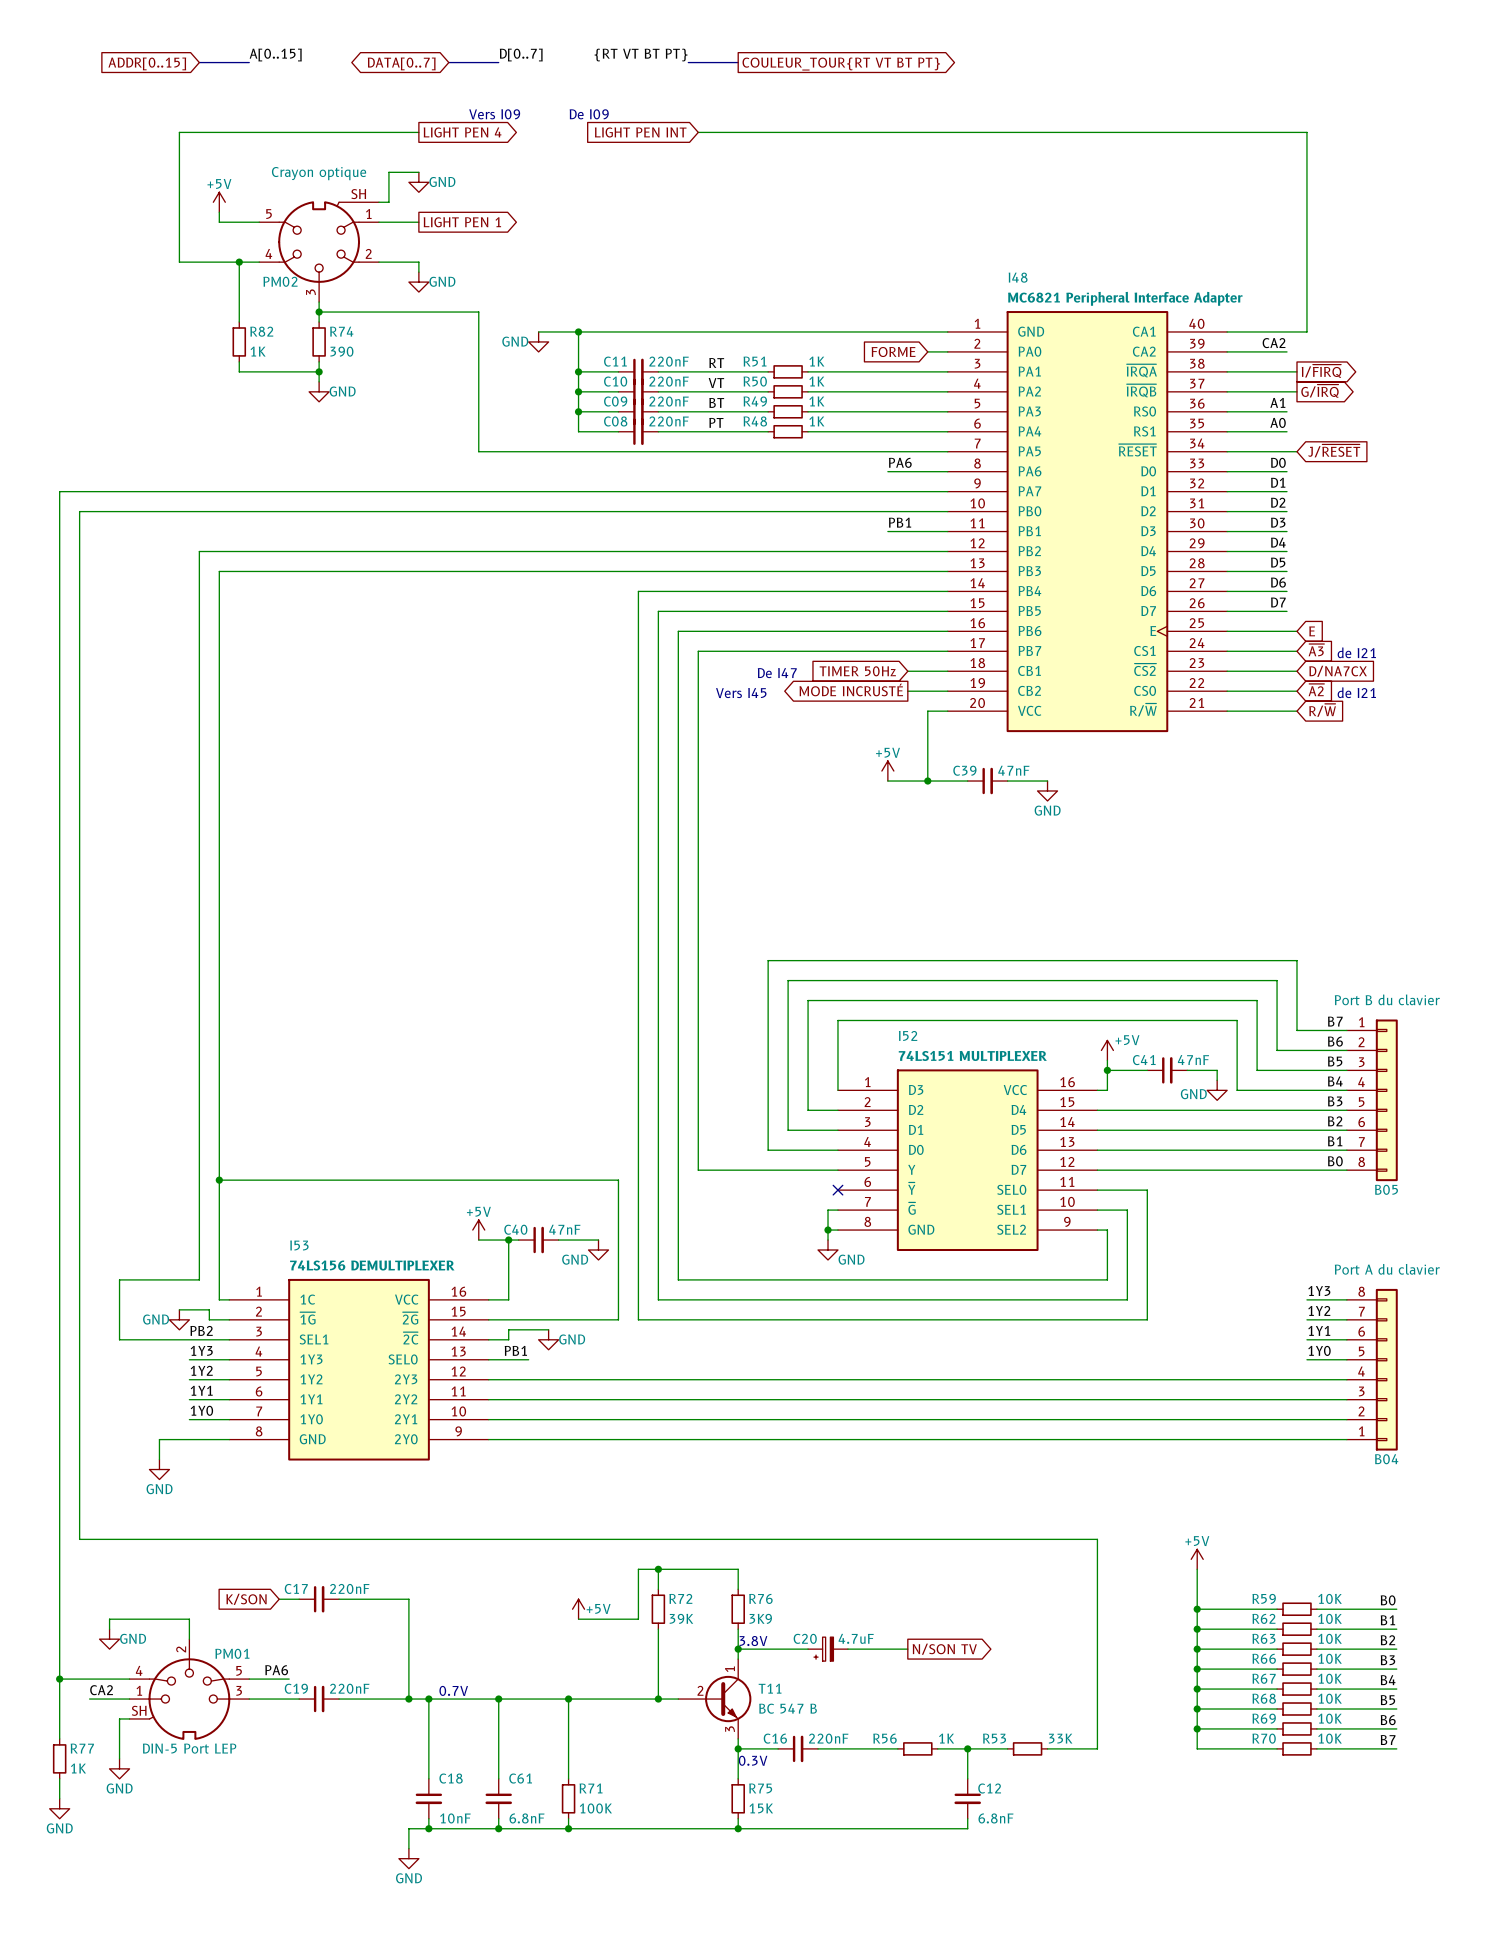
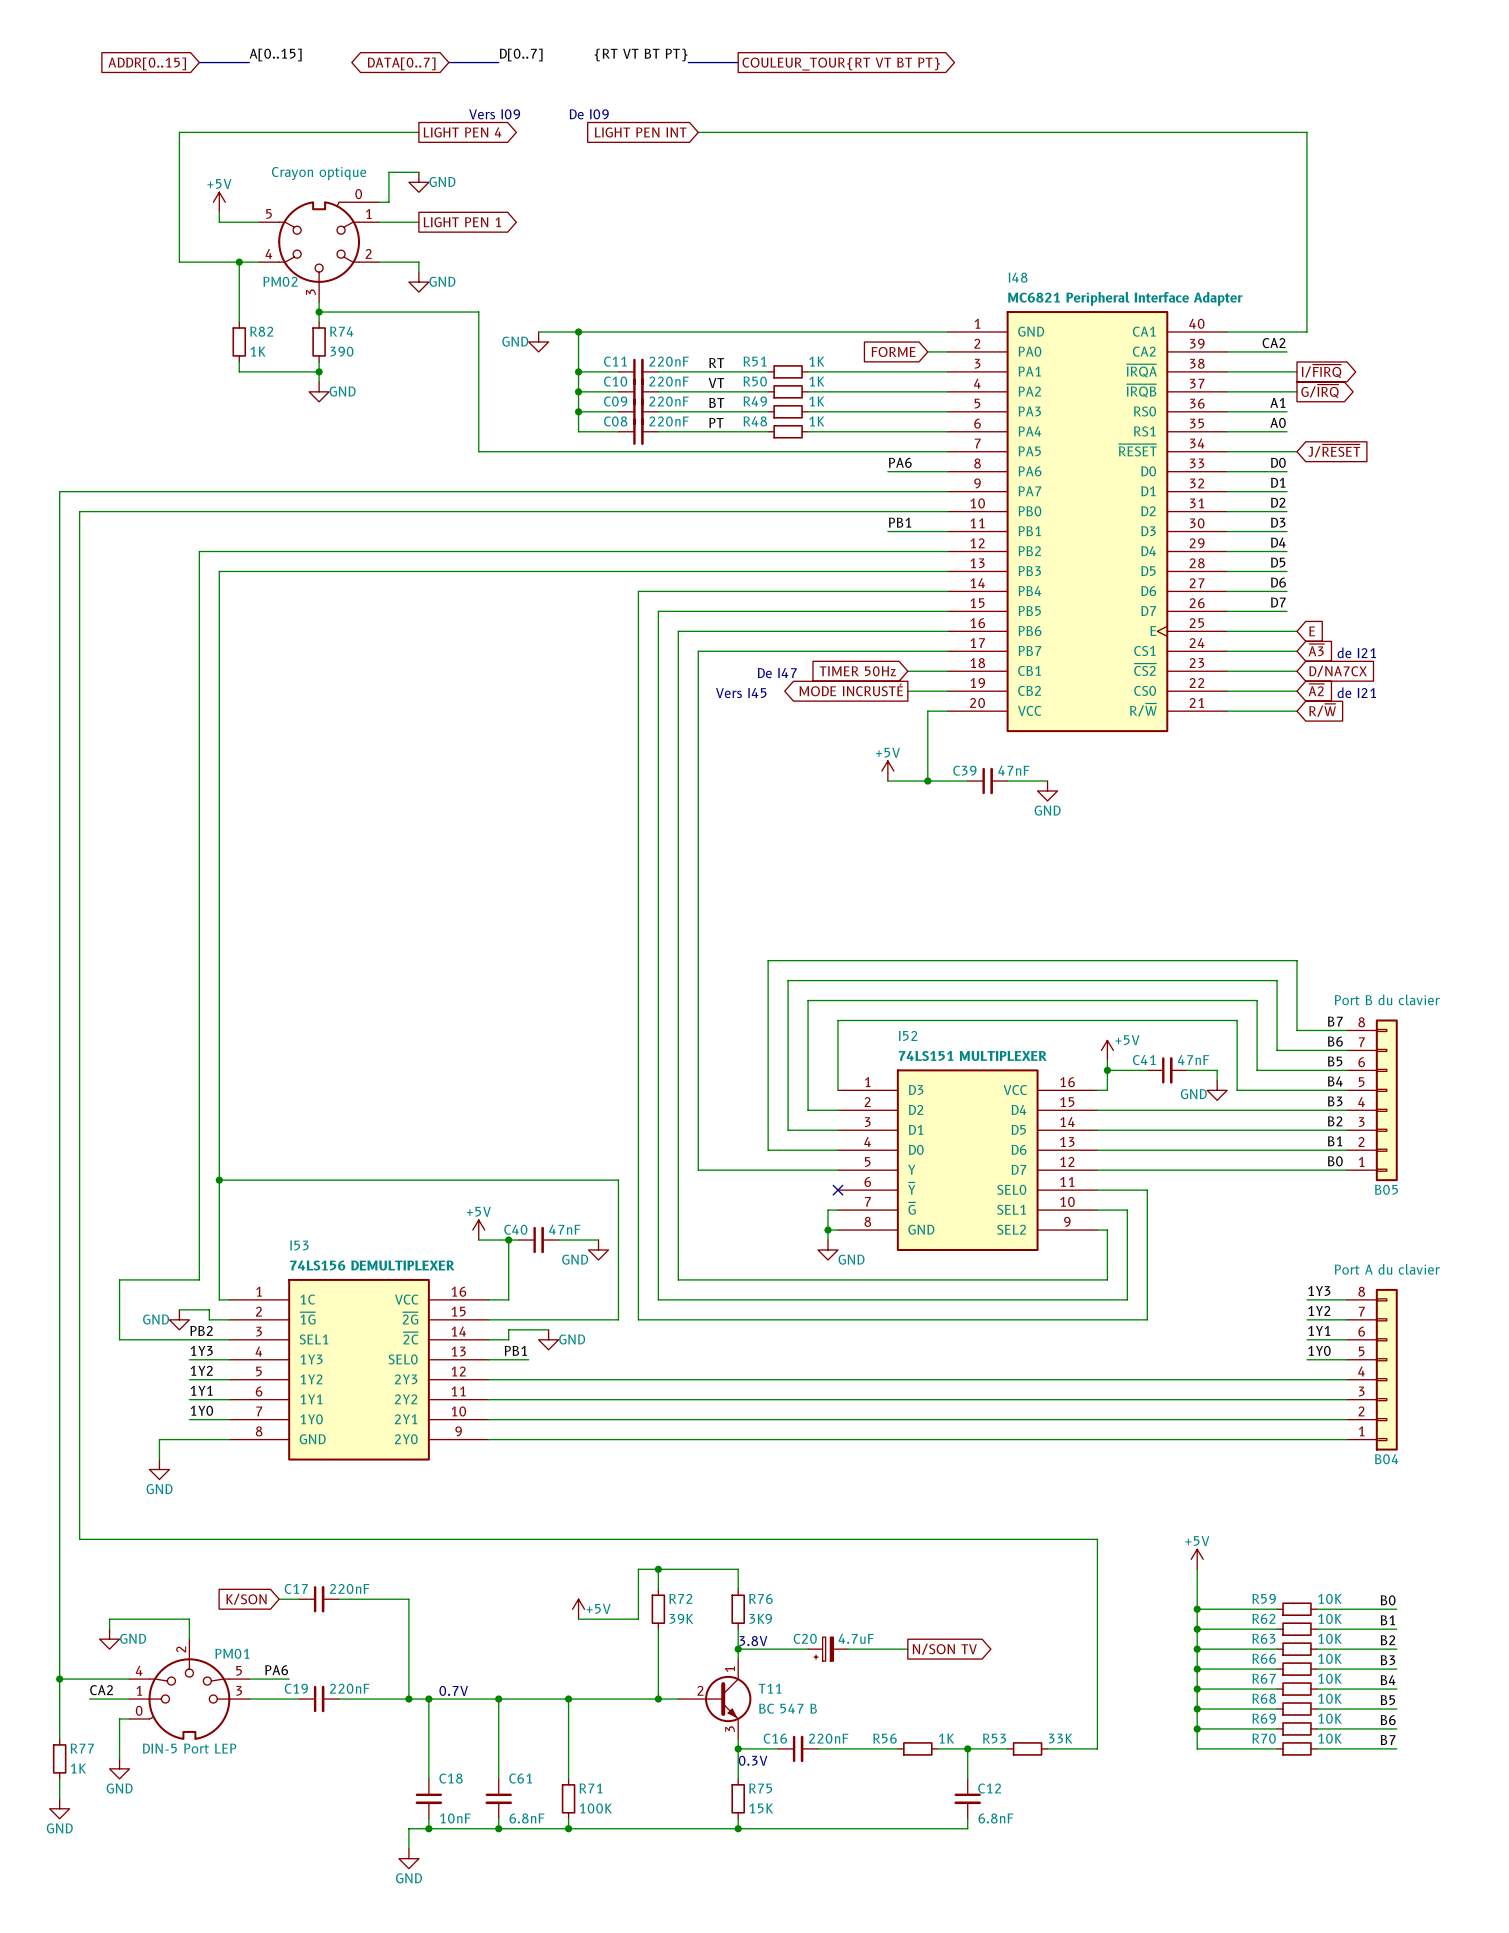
PM02 pin number: SH (358, 194) -> 0 (358, 194)
B05 flip: as is (1386, 1100) -> up-down (1386, 1100)
PM01 pin number: SH (139, 1710) -> 0 (139, 1710)

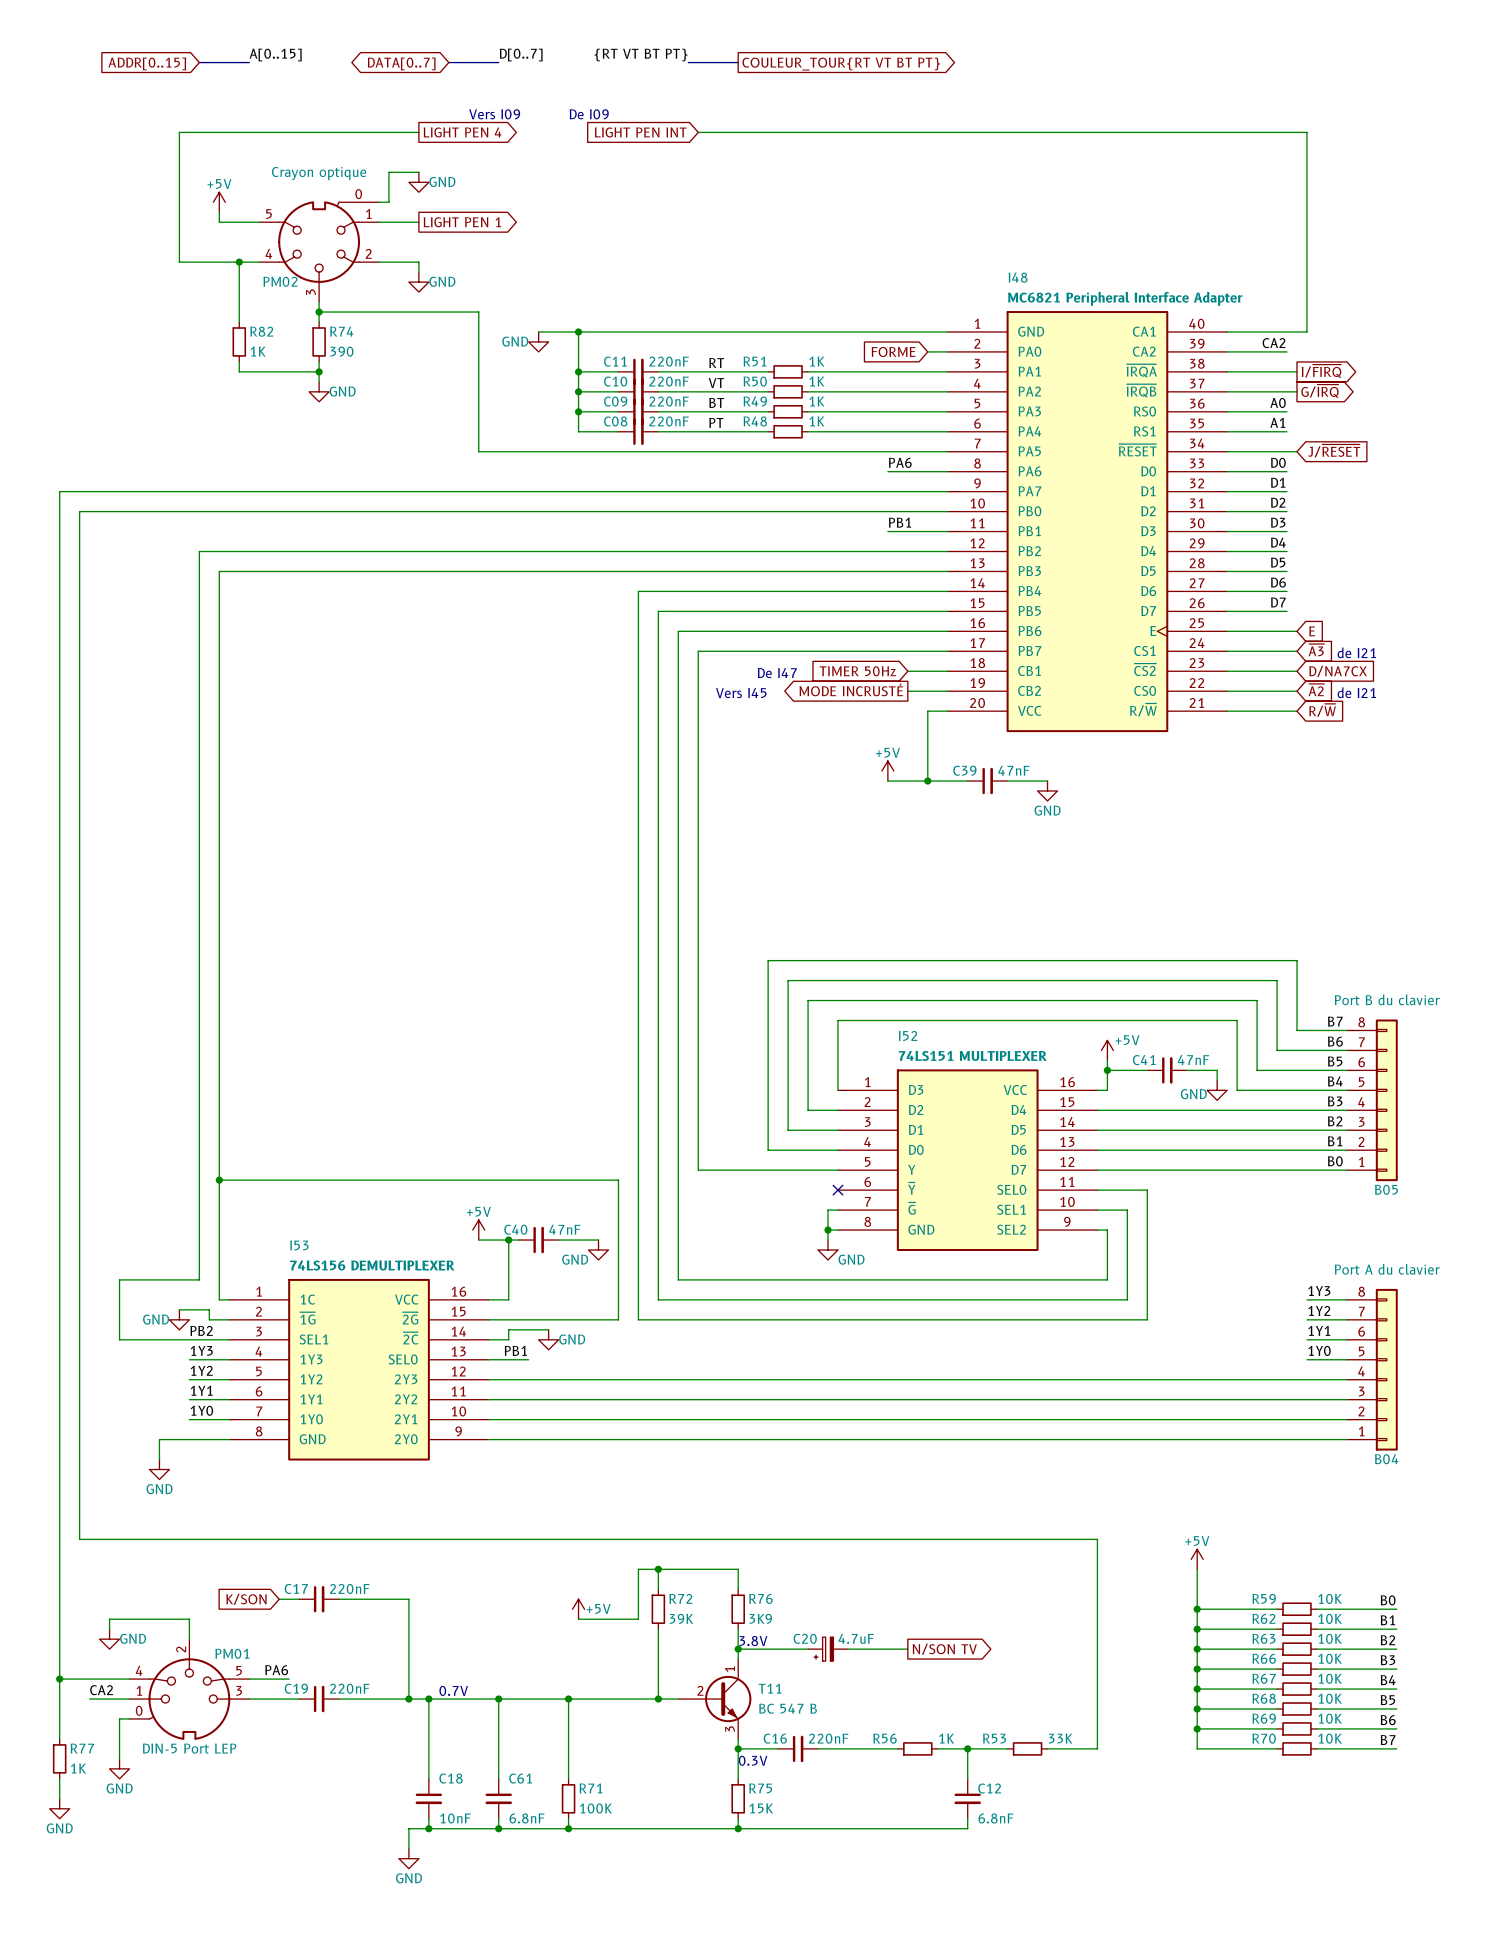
label: A1 (1277, 402) -> A0 (1278, 402)
label: A0 (1278, 422) -> A1 (1277, 422)

